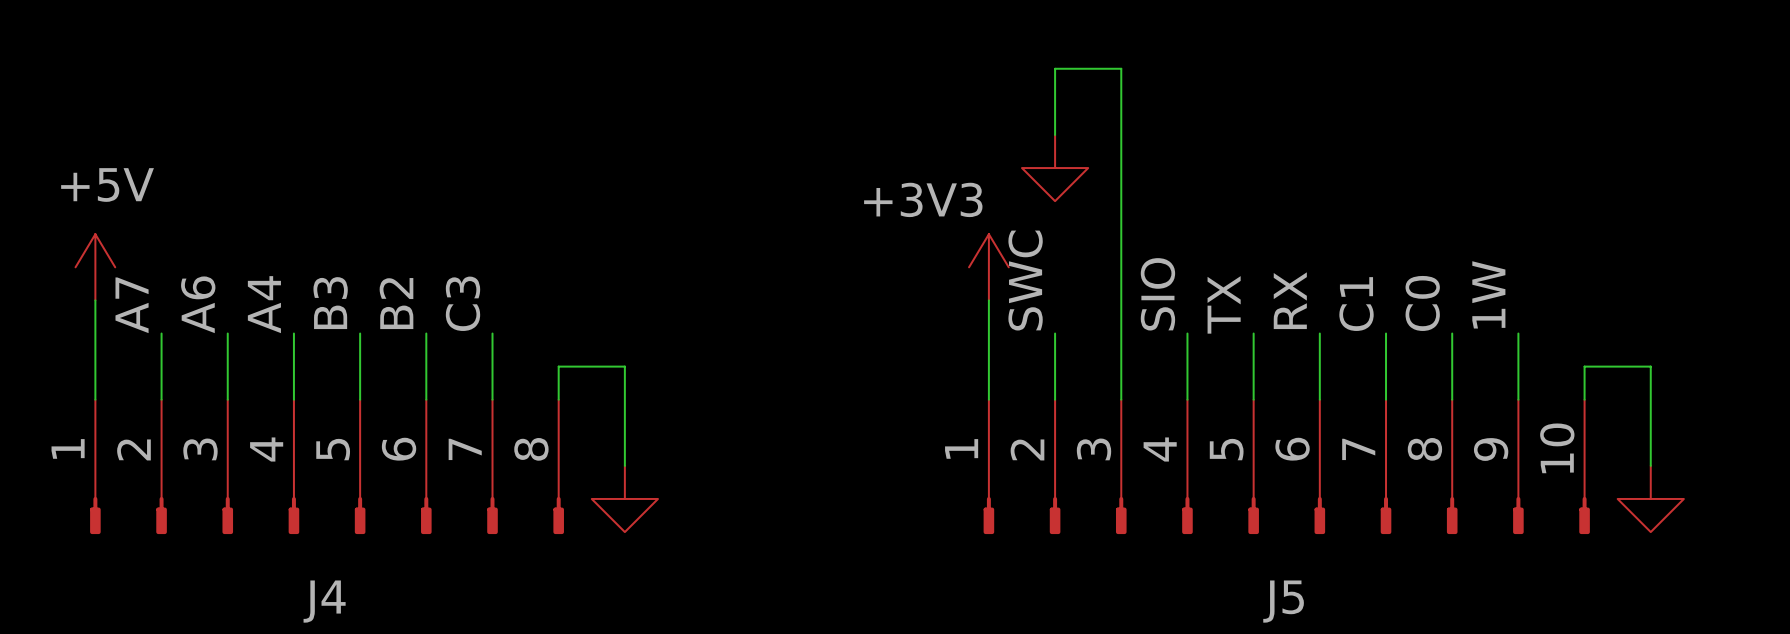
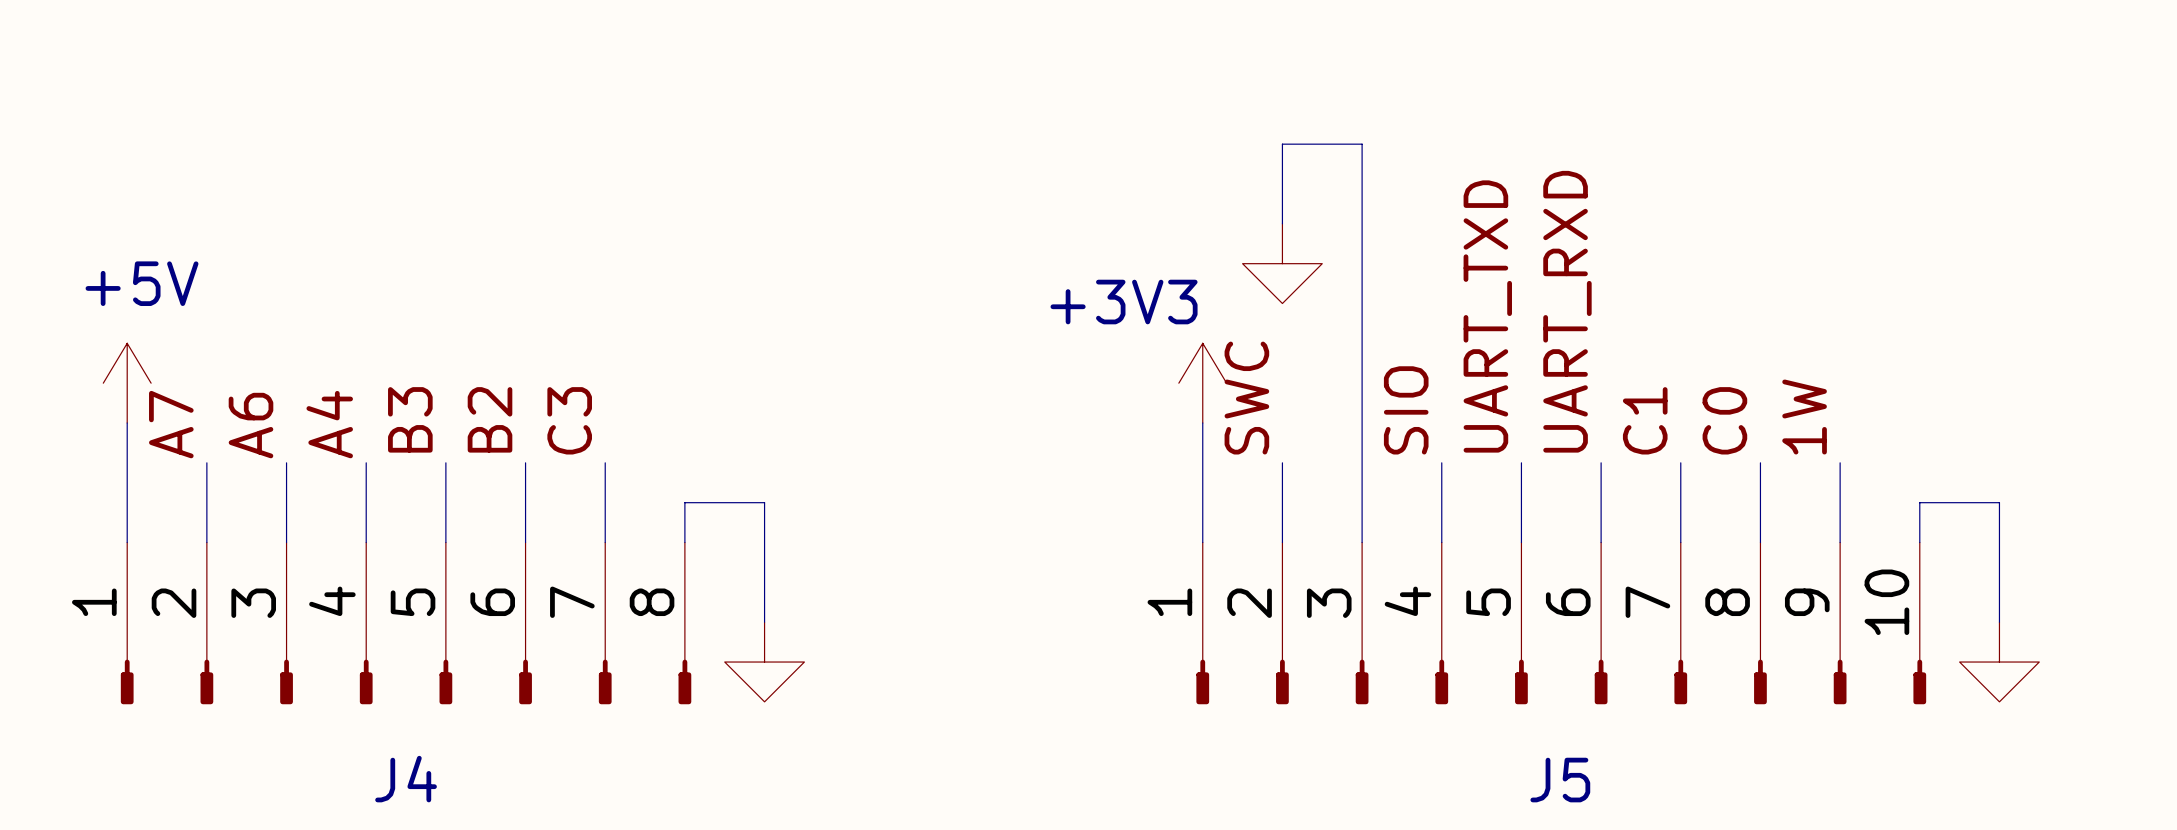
label: RX (1290, 300) -> UART_RXD (1567, 311)
label: TX (1224, 304) -> UART_TXD (1487, 316)

